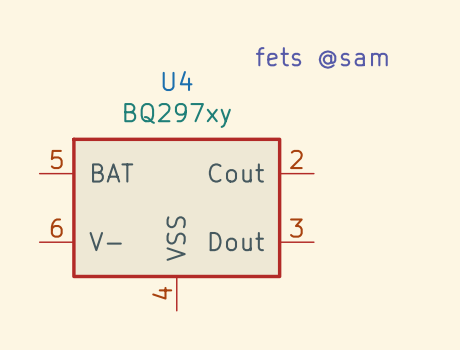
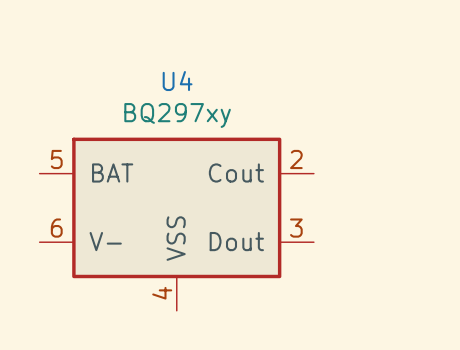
text: fets @sam (321, 57) -> none

